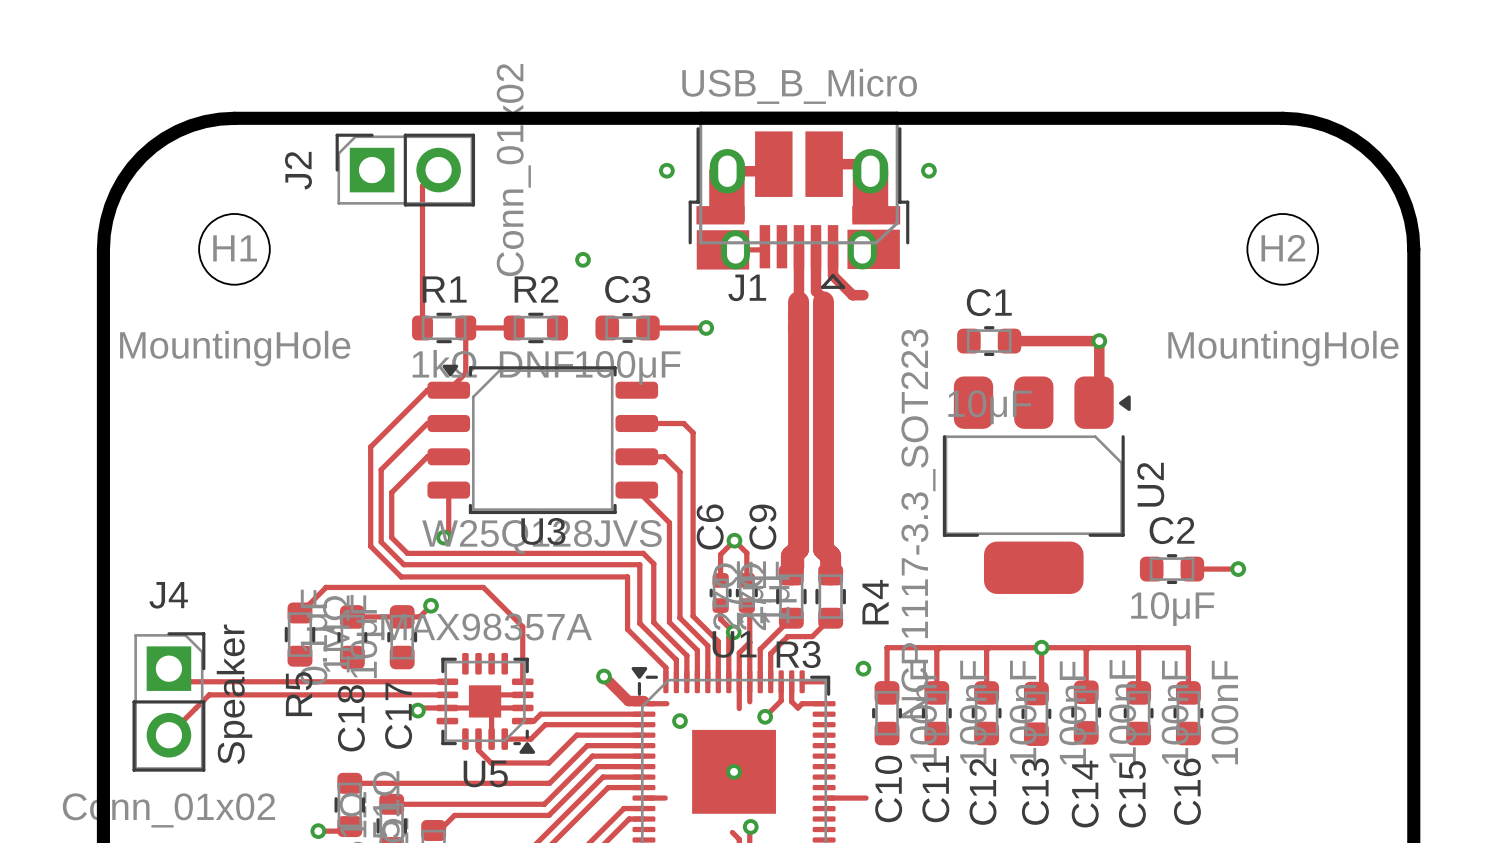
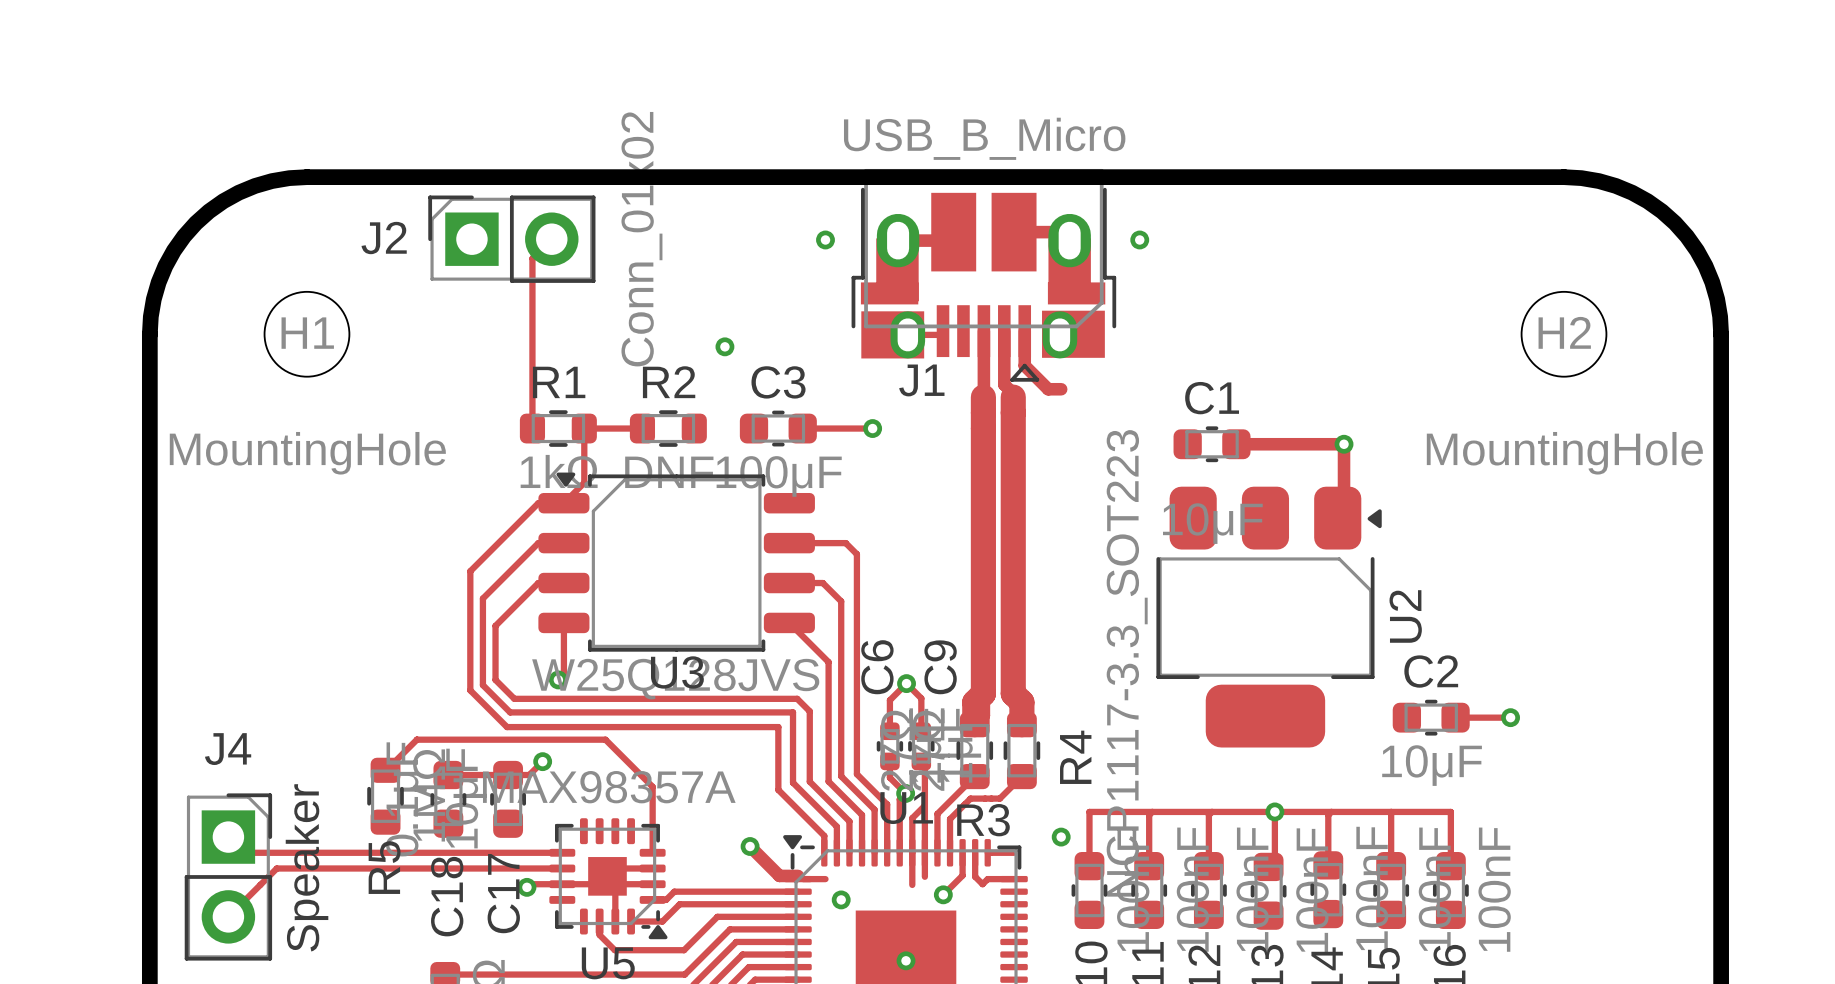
J2 name rotation: 0° (298, 170) -> 90° clockwise (384, 238)

